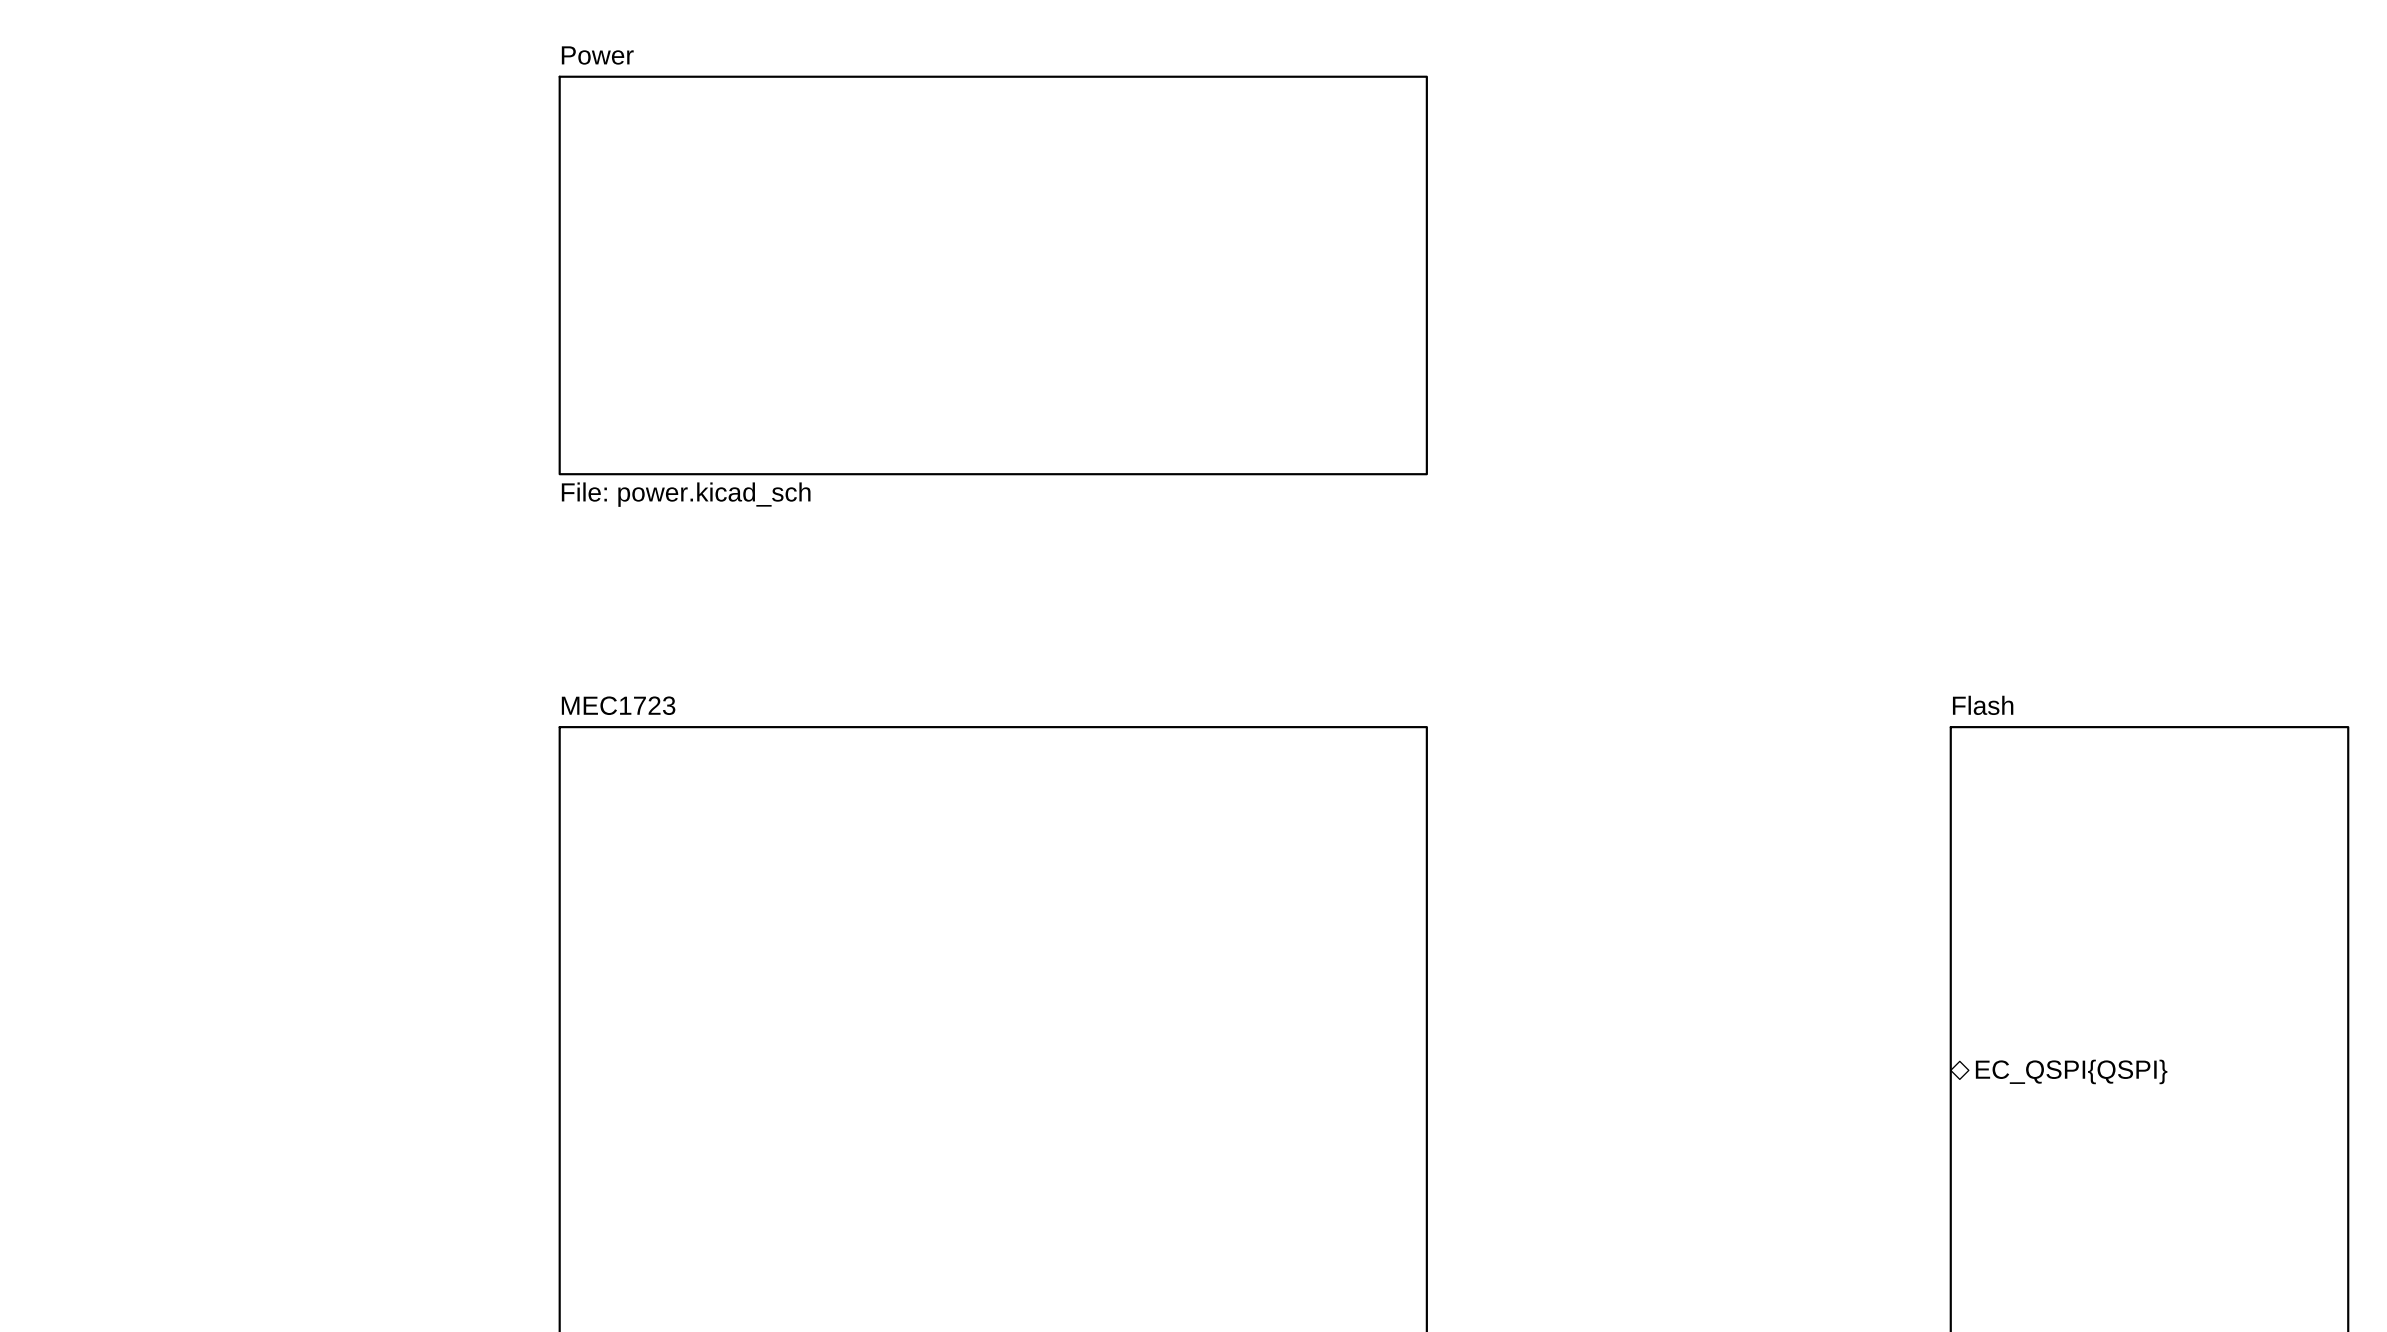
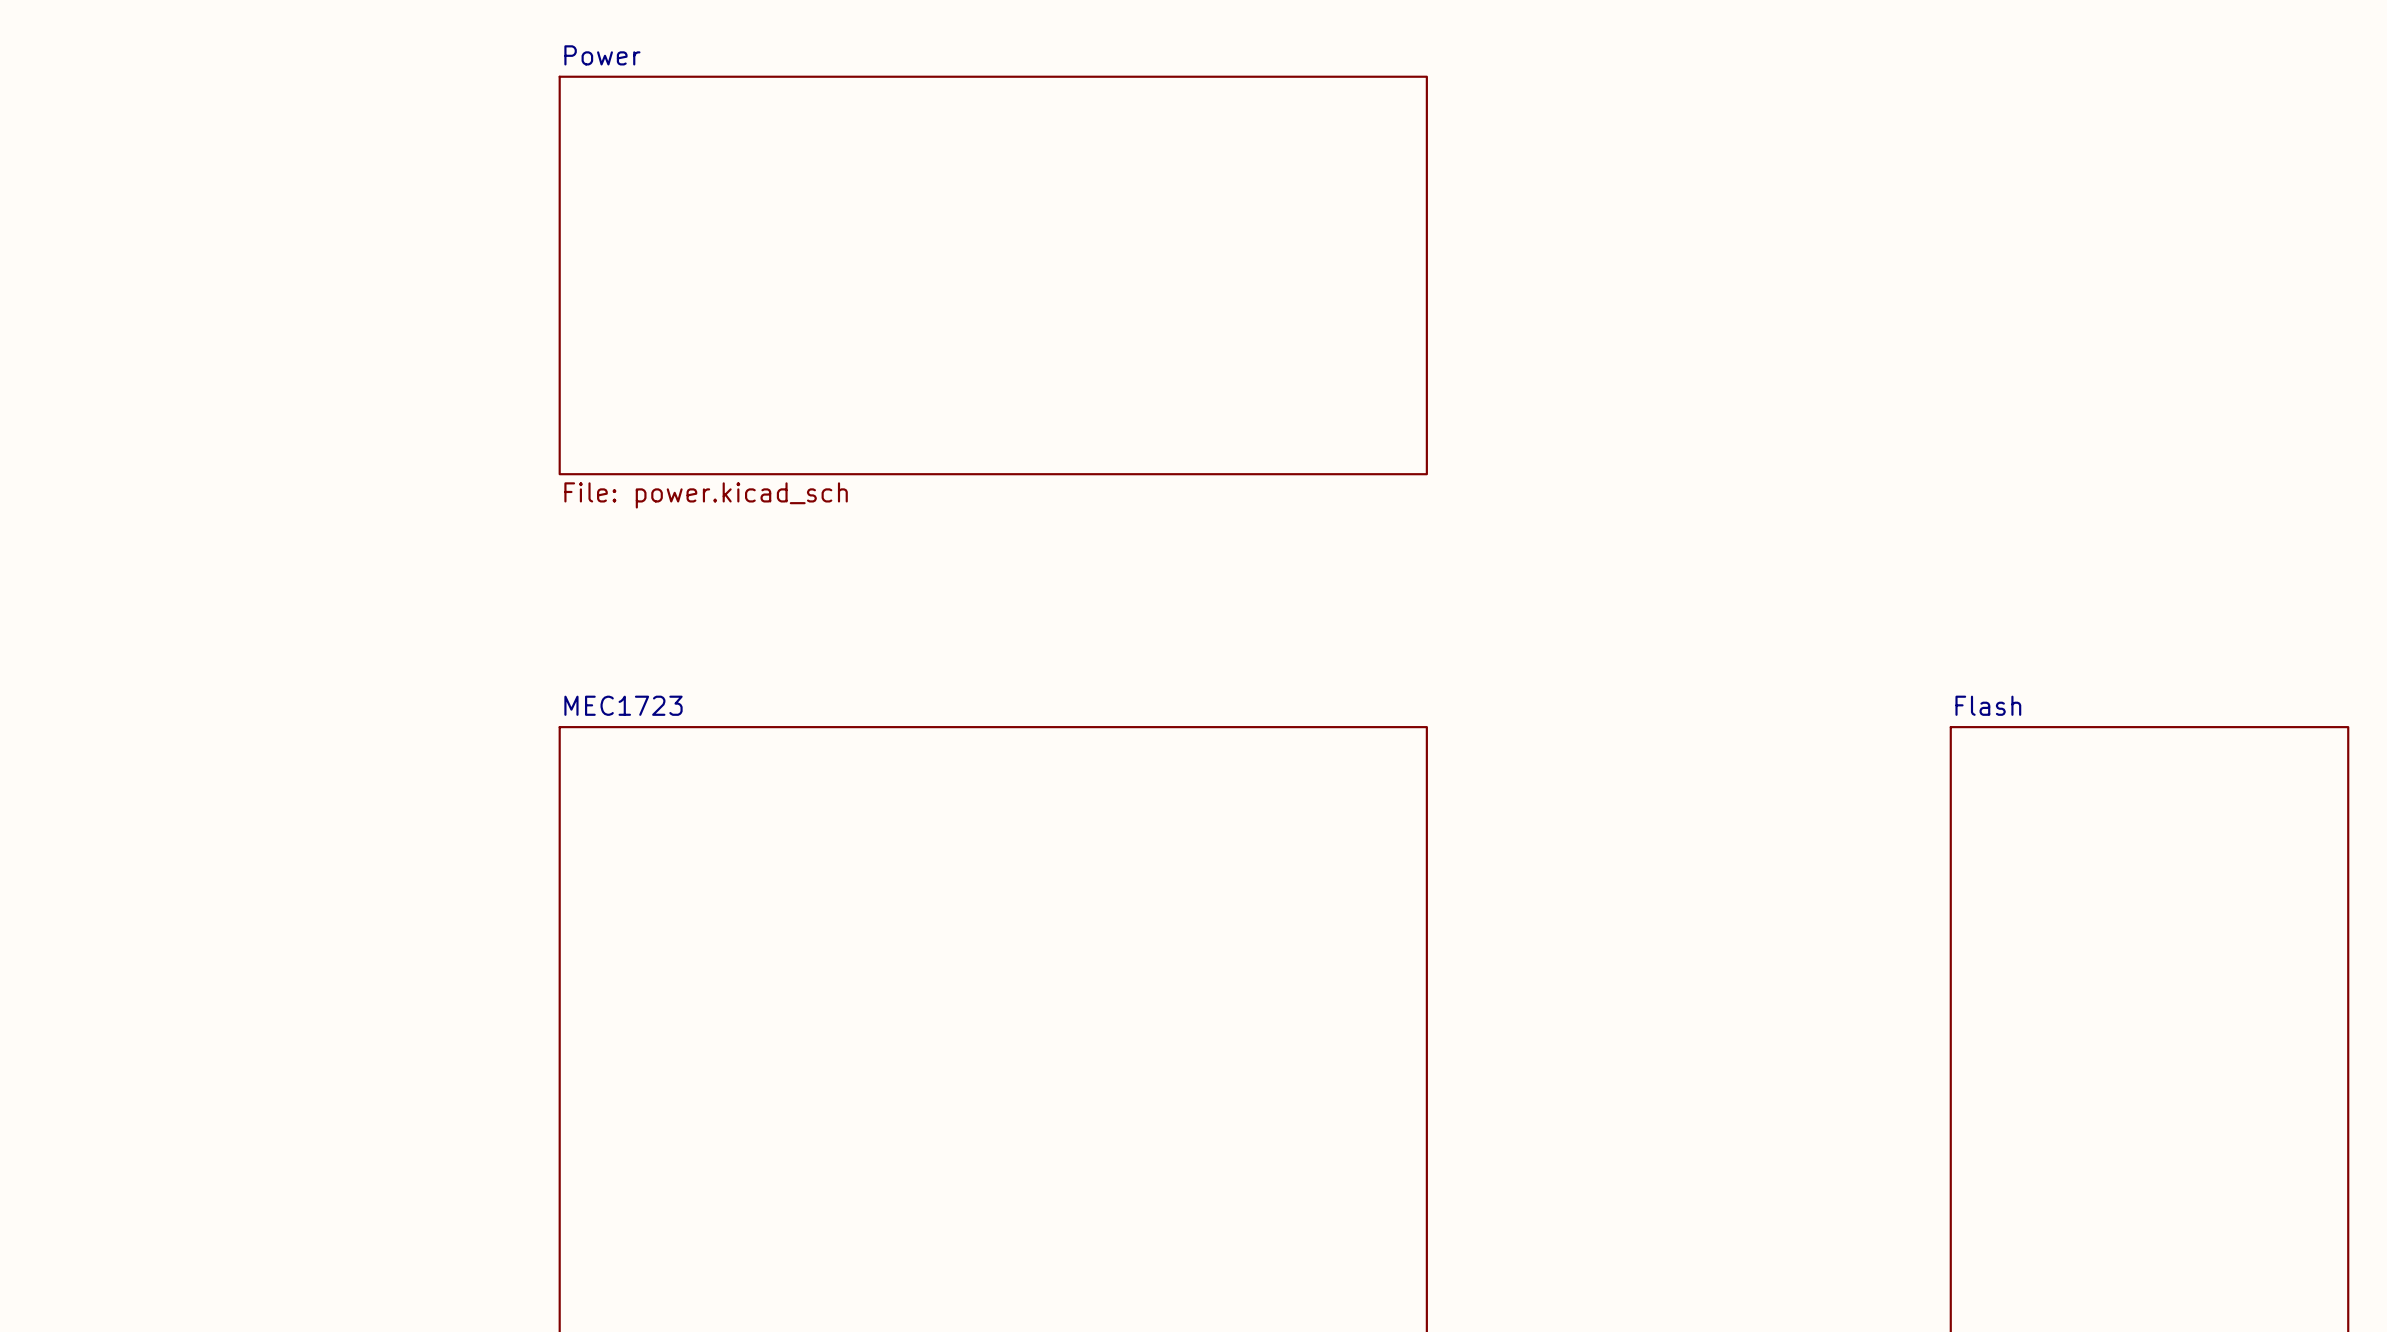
sheet pin: EC_QSPI{QSPI} (2071, 1071) -> none

